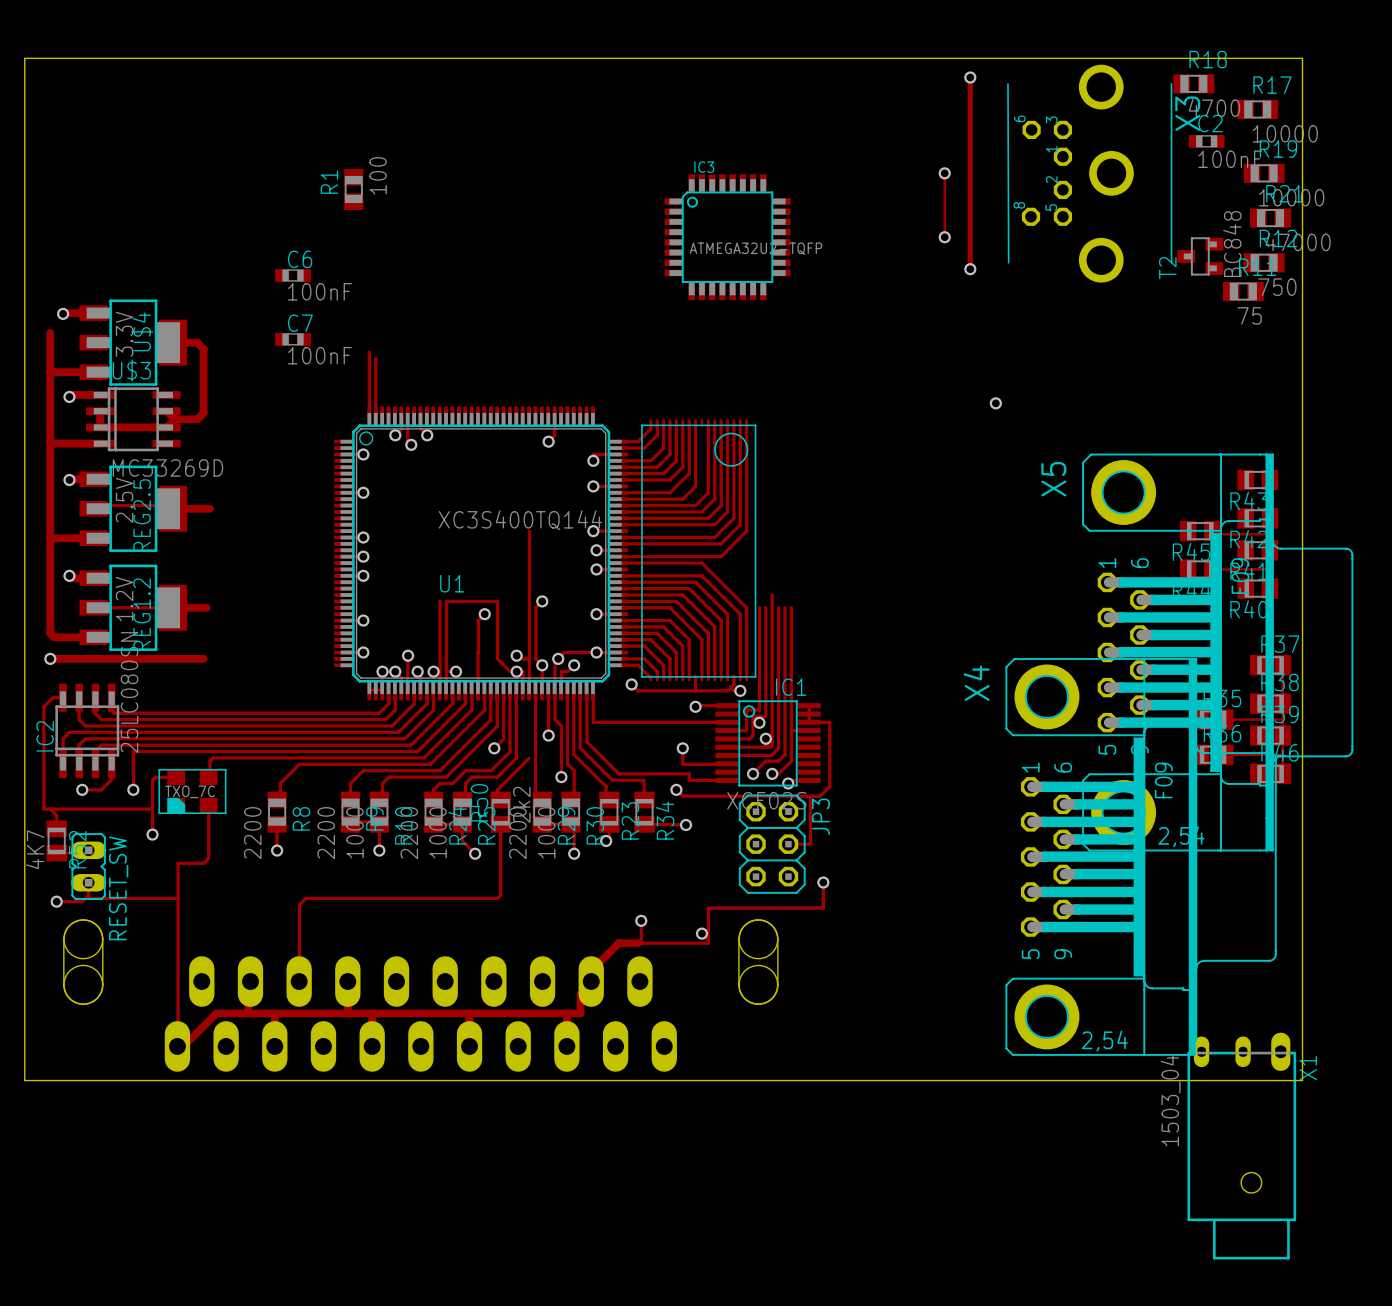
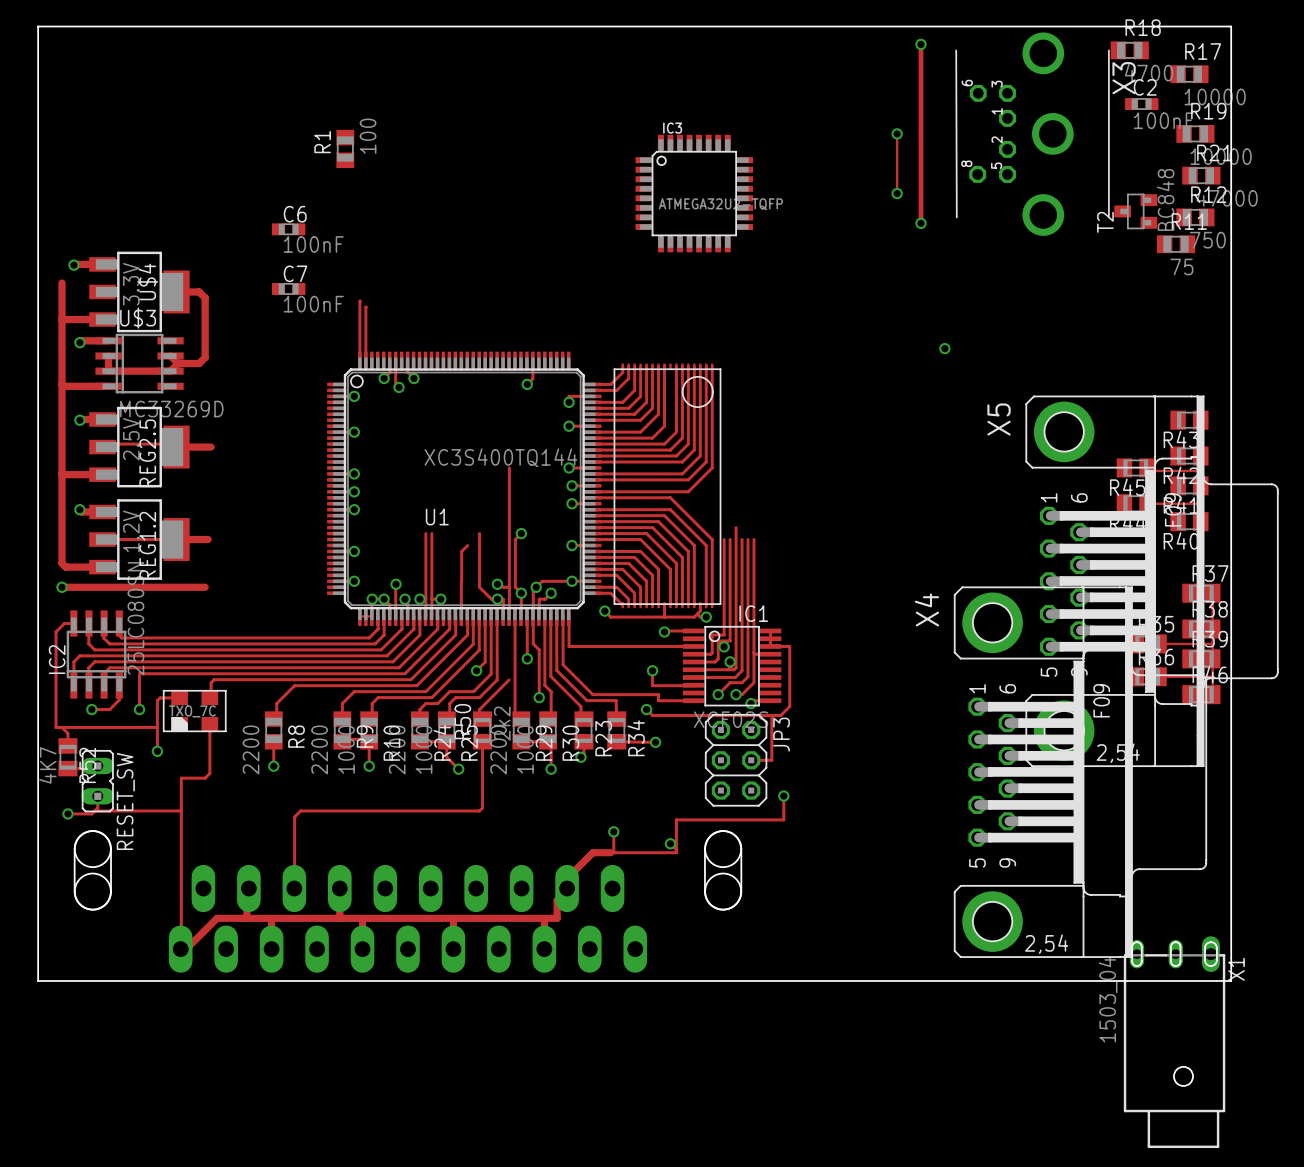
track: (446, 601) (497, 601) -> none
via: (484, 614) -> none

